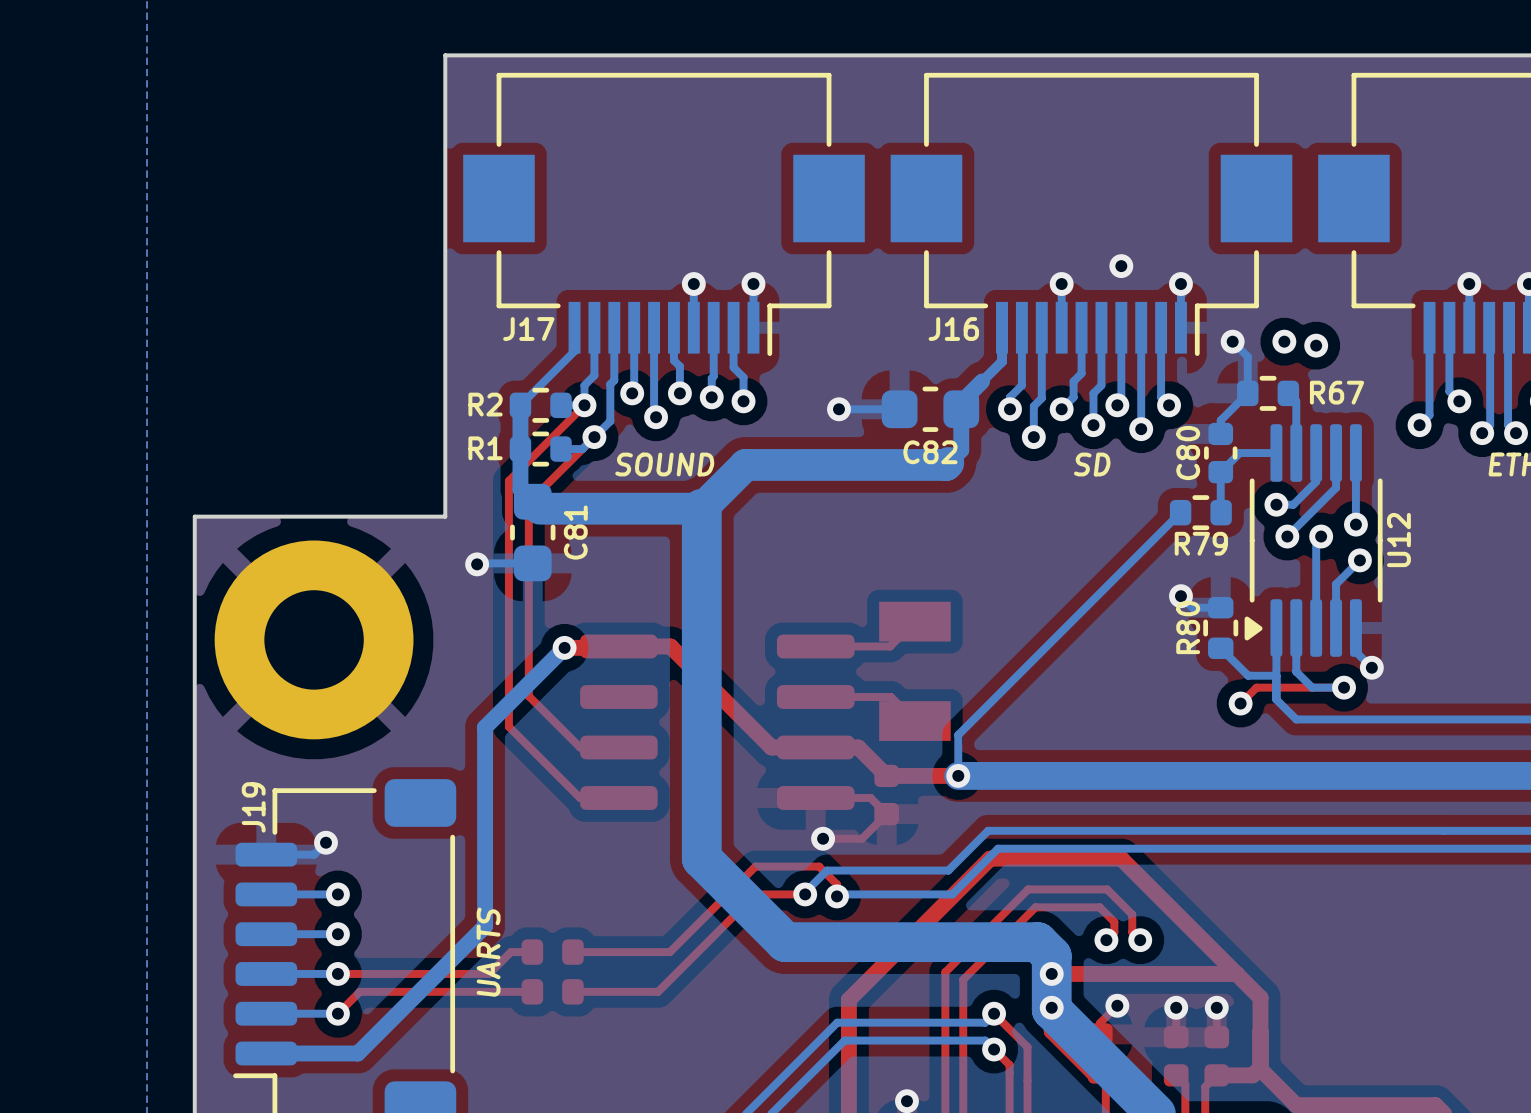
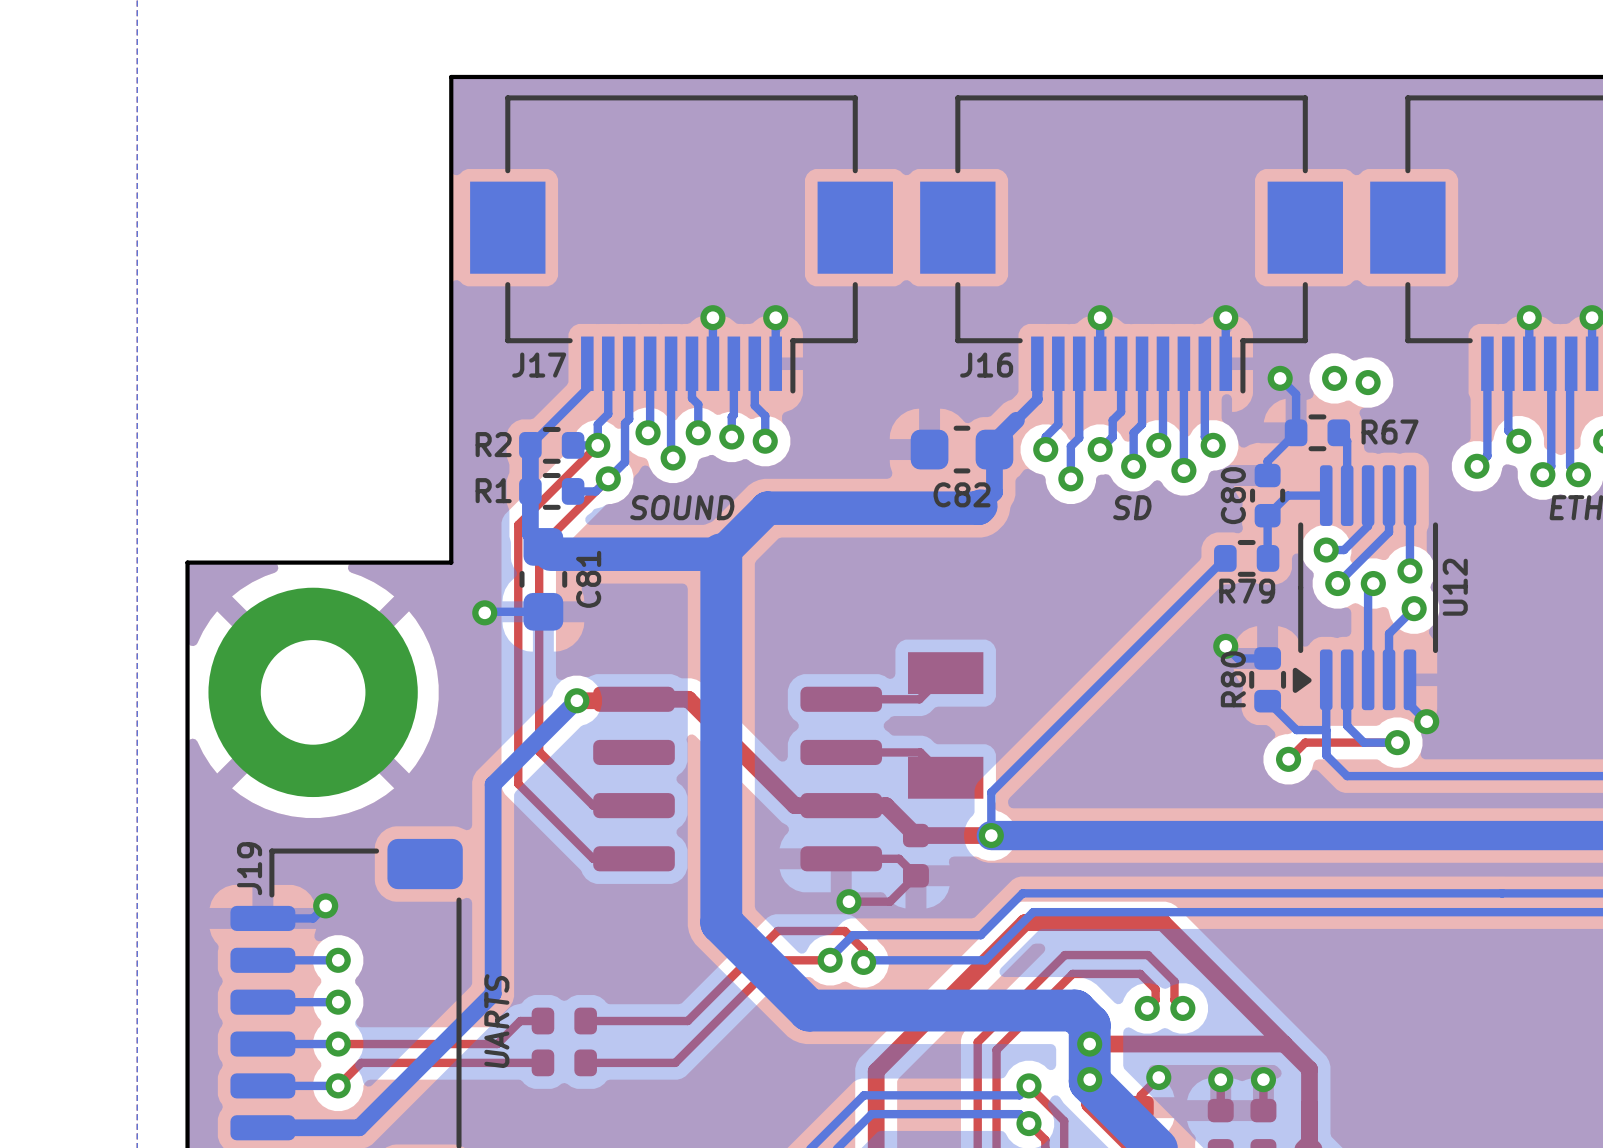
via: (1121, 266) -> none
via: (838, 409) -> none
bottom track: (899, 409) (838, 409) -> none

